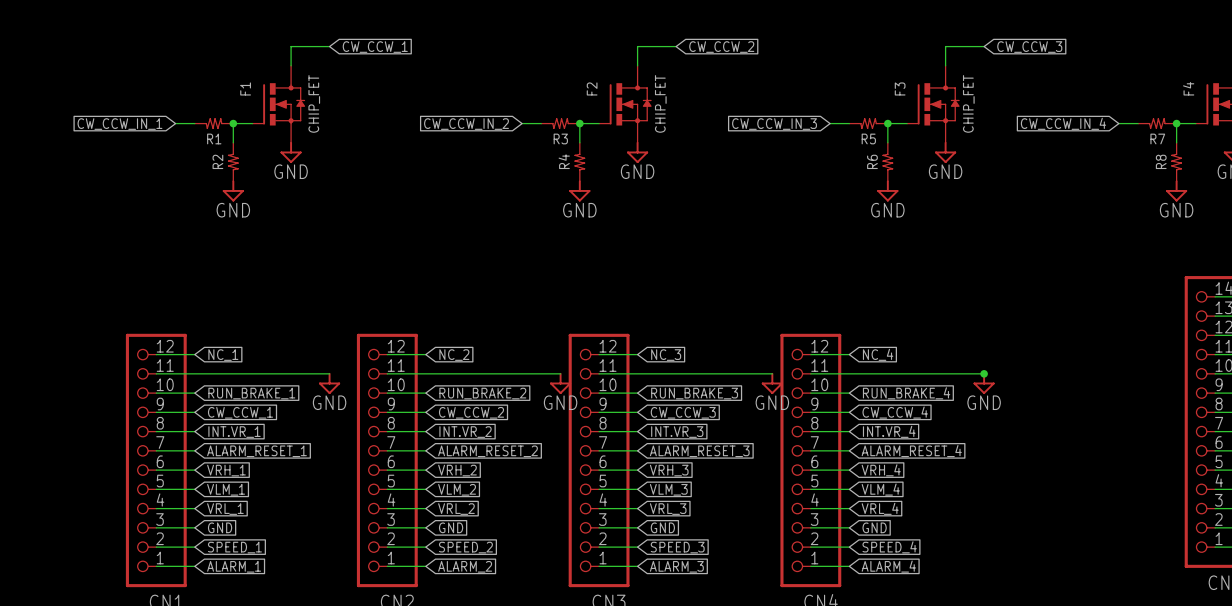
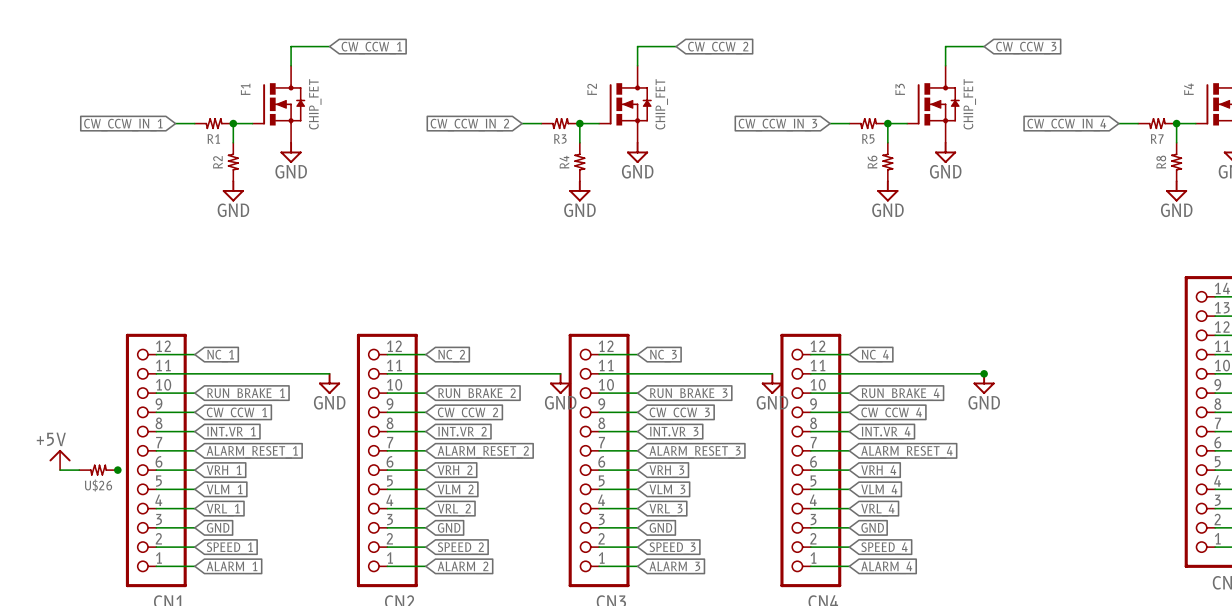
power symbol: none -> +5V (60, 459)
wire: none -> (60, 470) (79, 470)
U$26: none -> (98, 470)
junction: none -> (117, 470)

